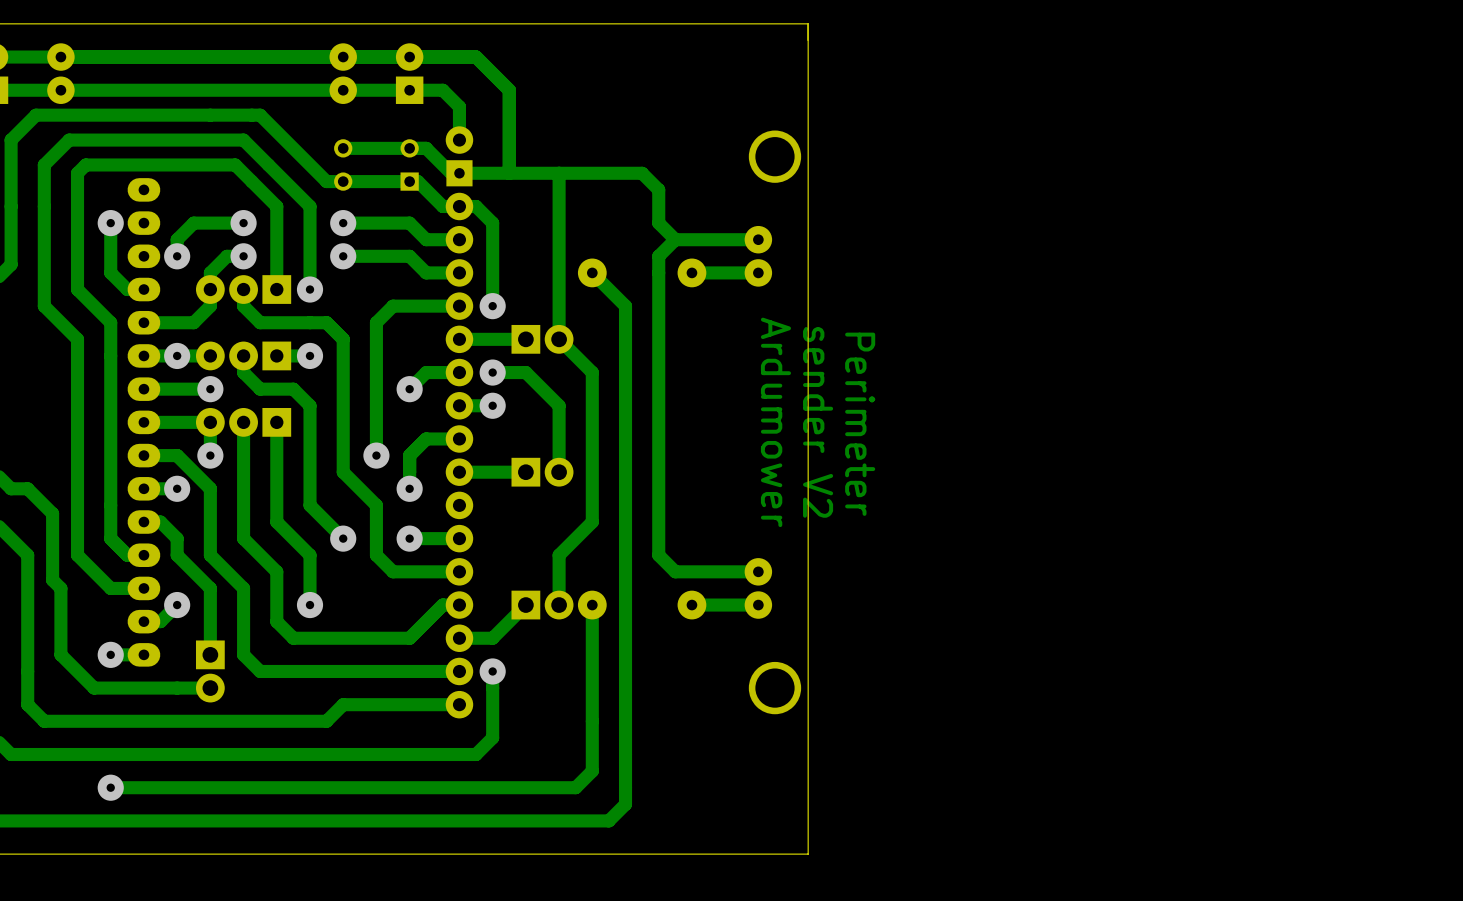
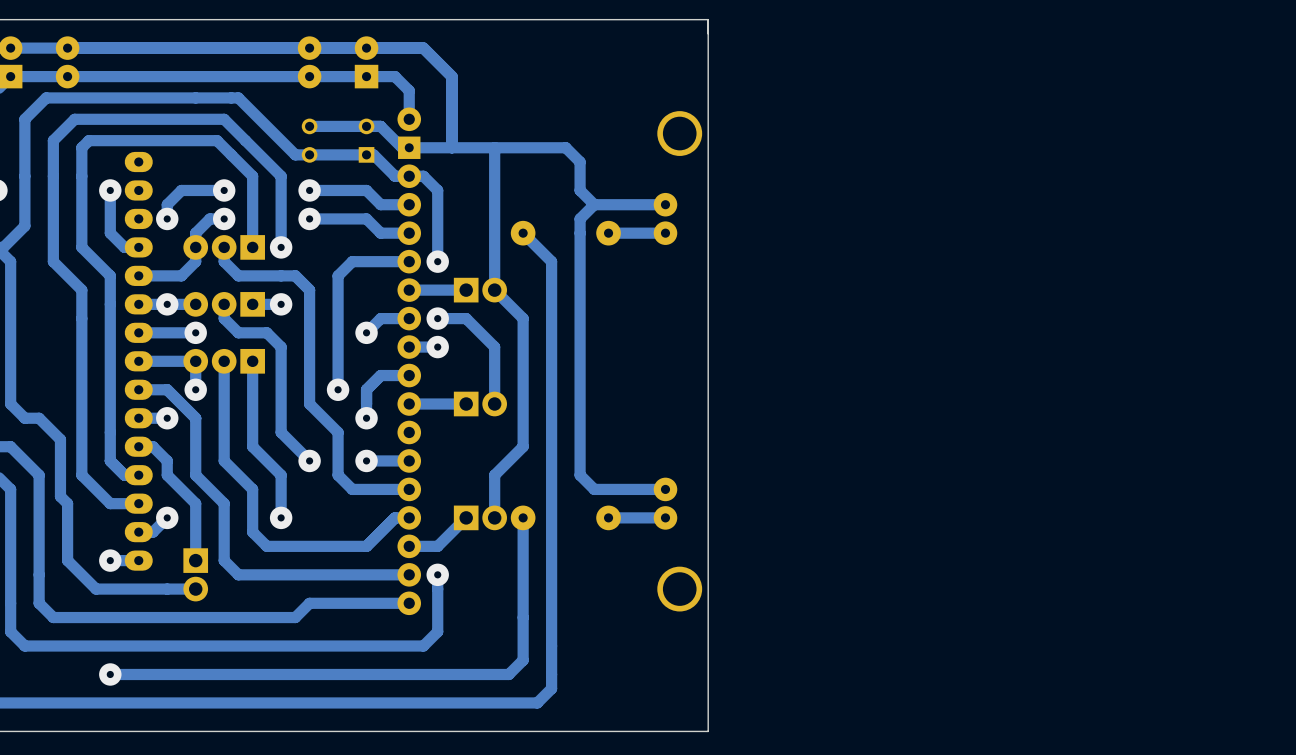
text: Ardumower (775, 422) -> none
text: sender V2 (818, 422) -> none
text: Perimeter (860, 424) -> none

